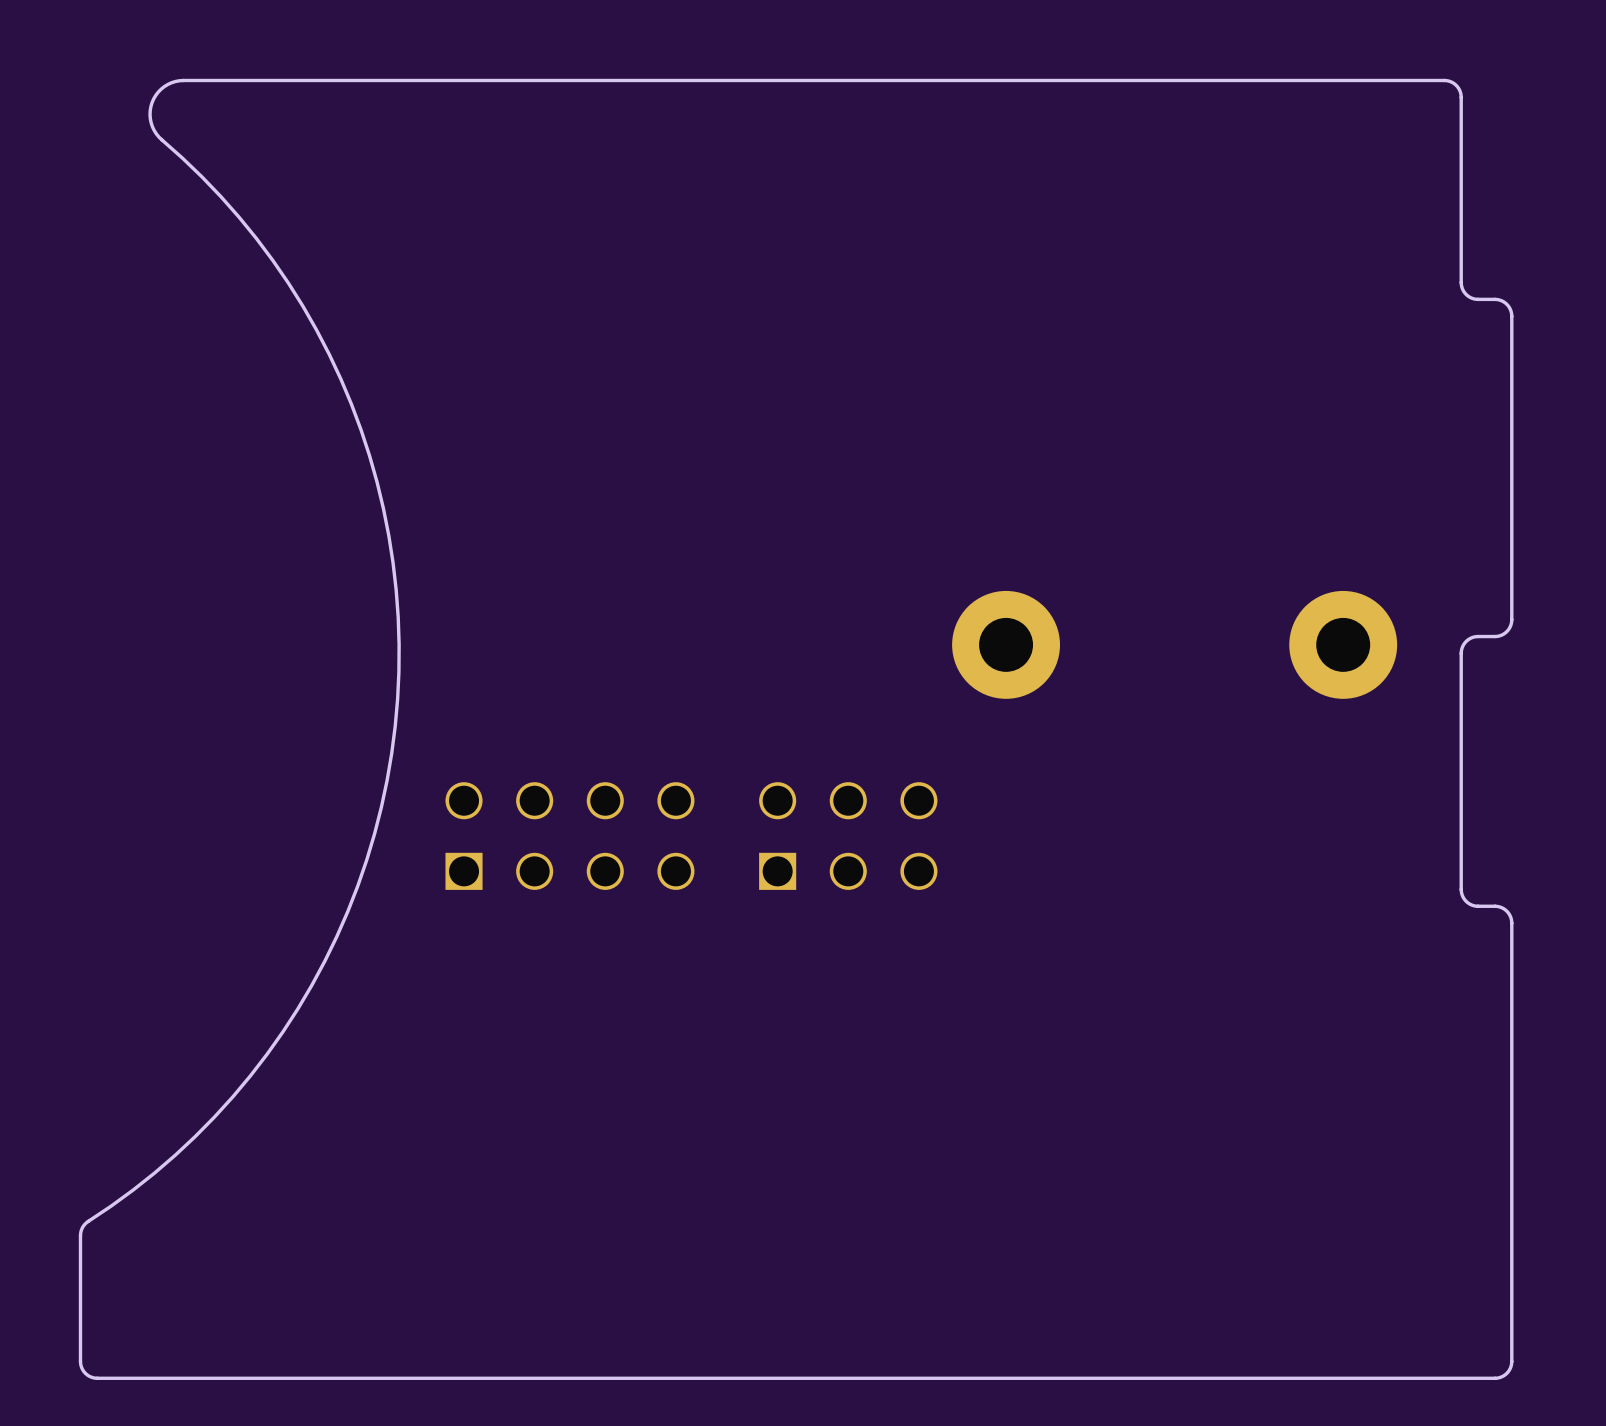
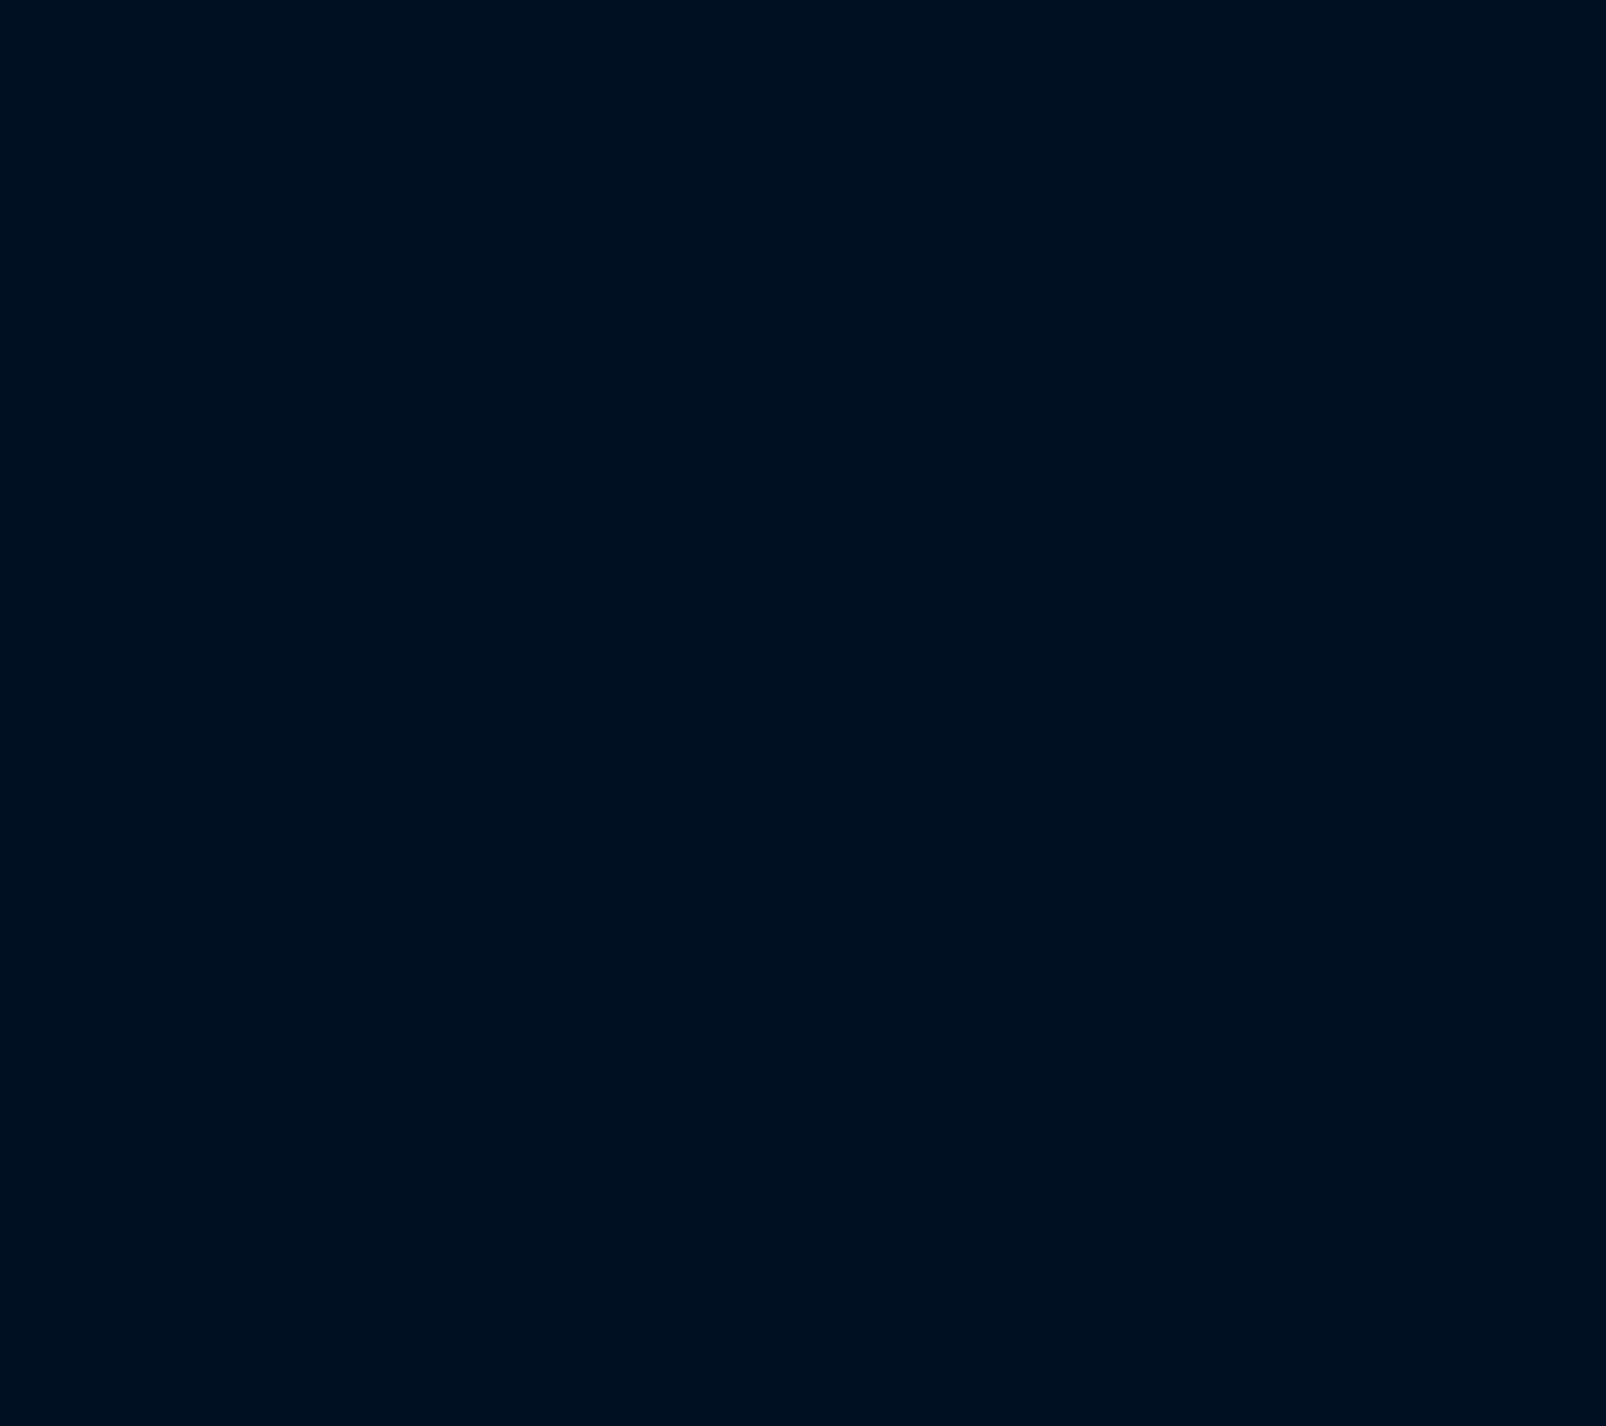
board edge: (1444, 80) (183, 80) (171, 82) (161, 89) (153, 98) (150, 110) (154, 130) (221, 196) (272, 260) (316, 329) (351, 404) (369, 455) (388, 535) (398, 617) (397, 699) (387, 780) (366, 860) (336, 936) (297, 1008) (250, 1075) (214, 1117) (154, 1173) (86, 1222) (81, 1229) (80, 1361) (85, 1373) (97, 1378) (1494, 1378) (1506, 1373) (1511, 1361) (1511, 921) (1509, 914) (1503, 908) (1496, 906) (1472, 905) (1466, 901) (1461, 893) (1461, 653) (1463, 644) (1469, 639) (1476, 636) (1500, 635) (1508, 630) (1511, 621) (1511, 316) (1510, 308) (1503, 301) (1496, 299) (1472, 298) (1466, 294) (1461, 286) (1461, 95) (1456, 85) (1444, 80) -> none
part: (1006, 644) -> none
part: (1343, 644) -> none
part: (569, 836) -> none
part: (848, 836) -> none

